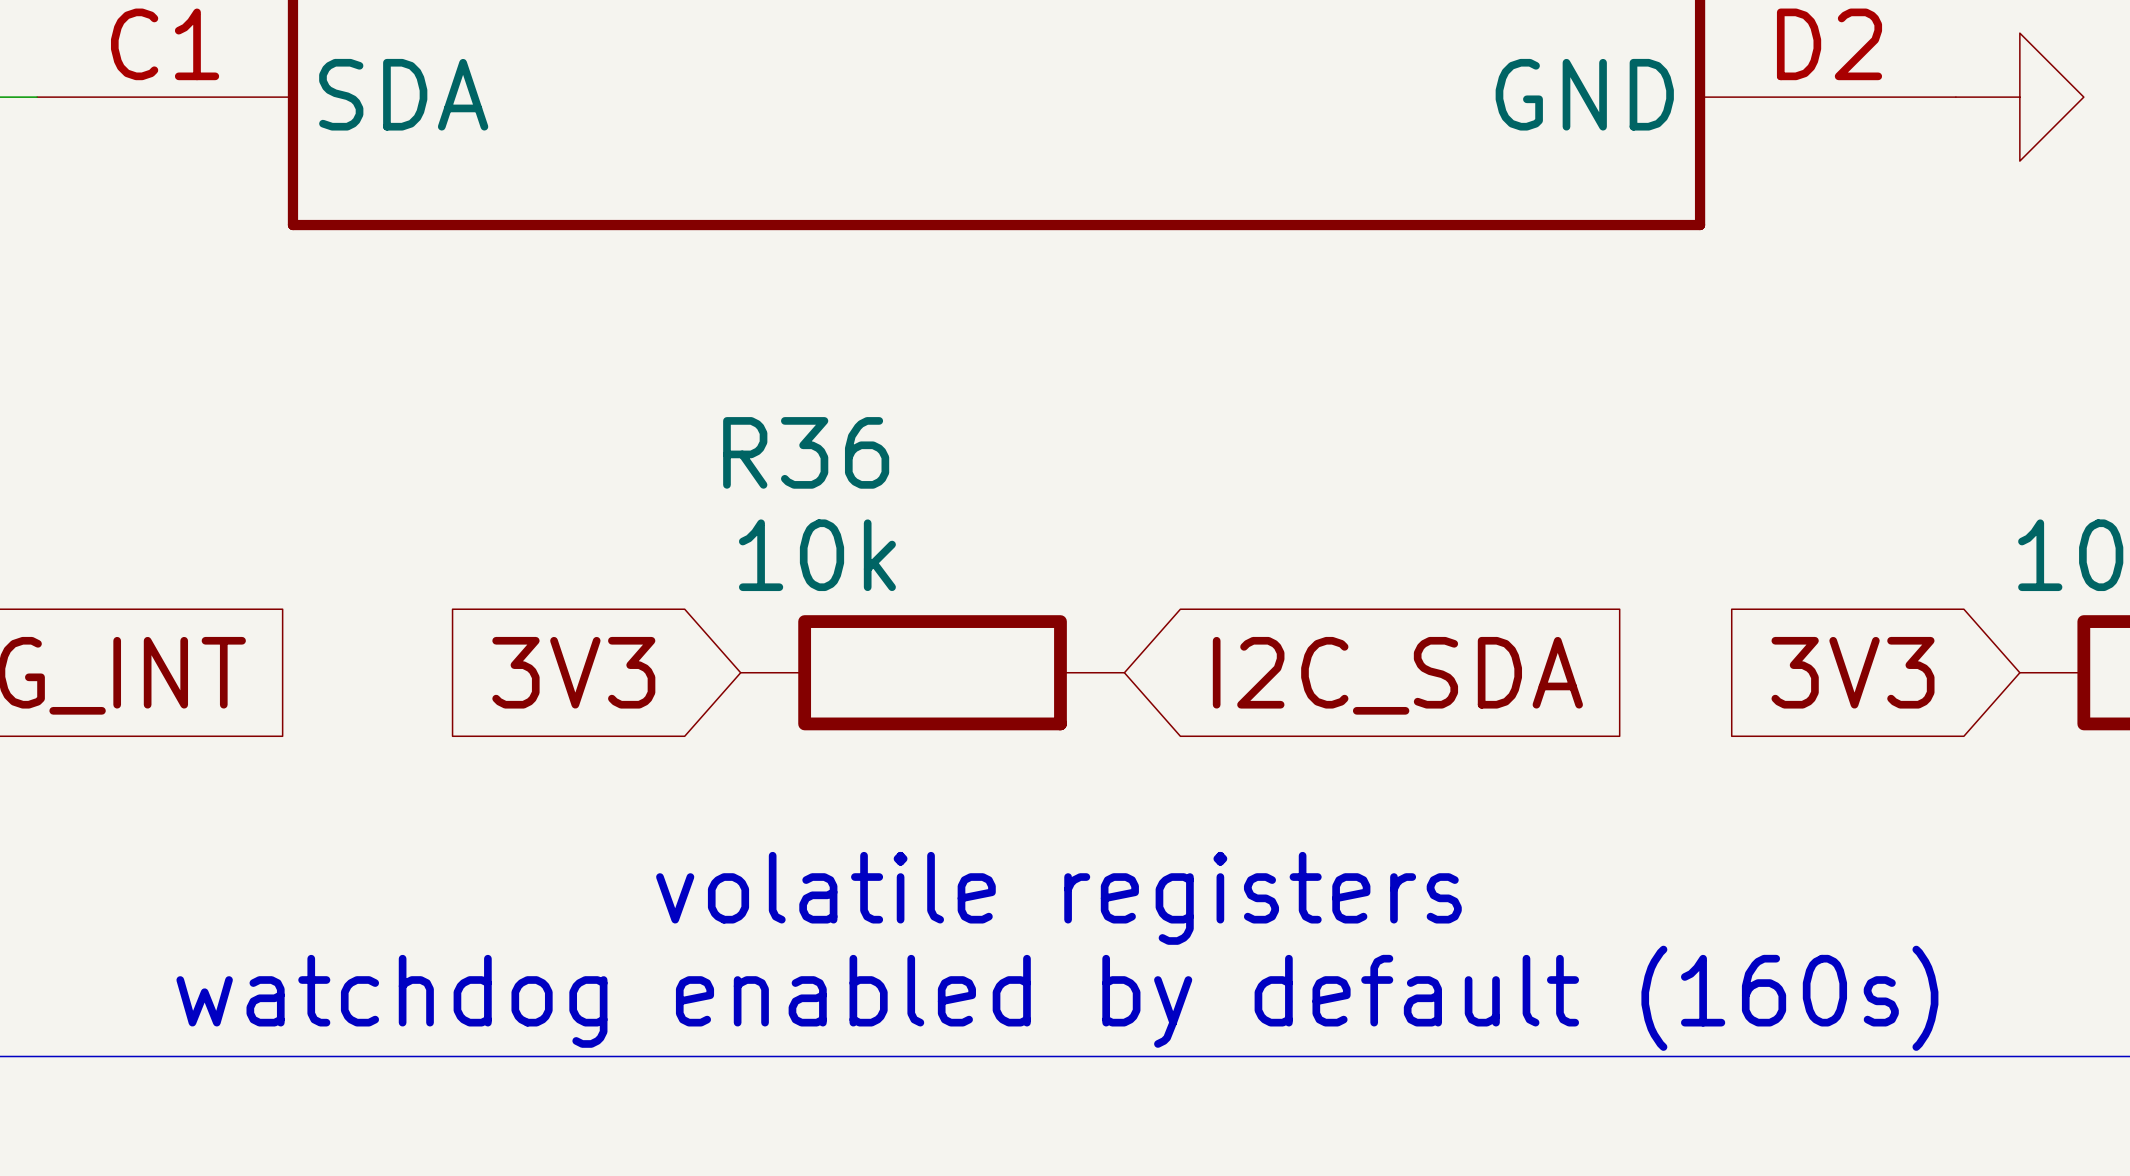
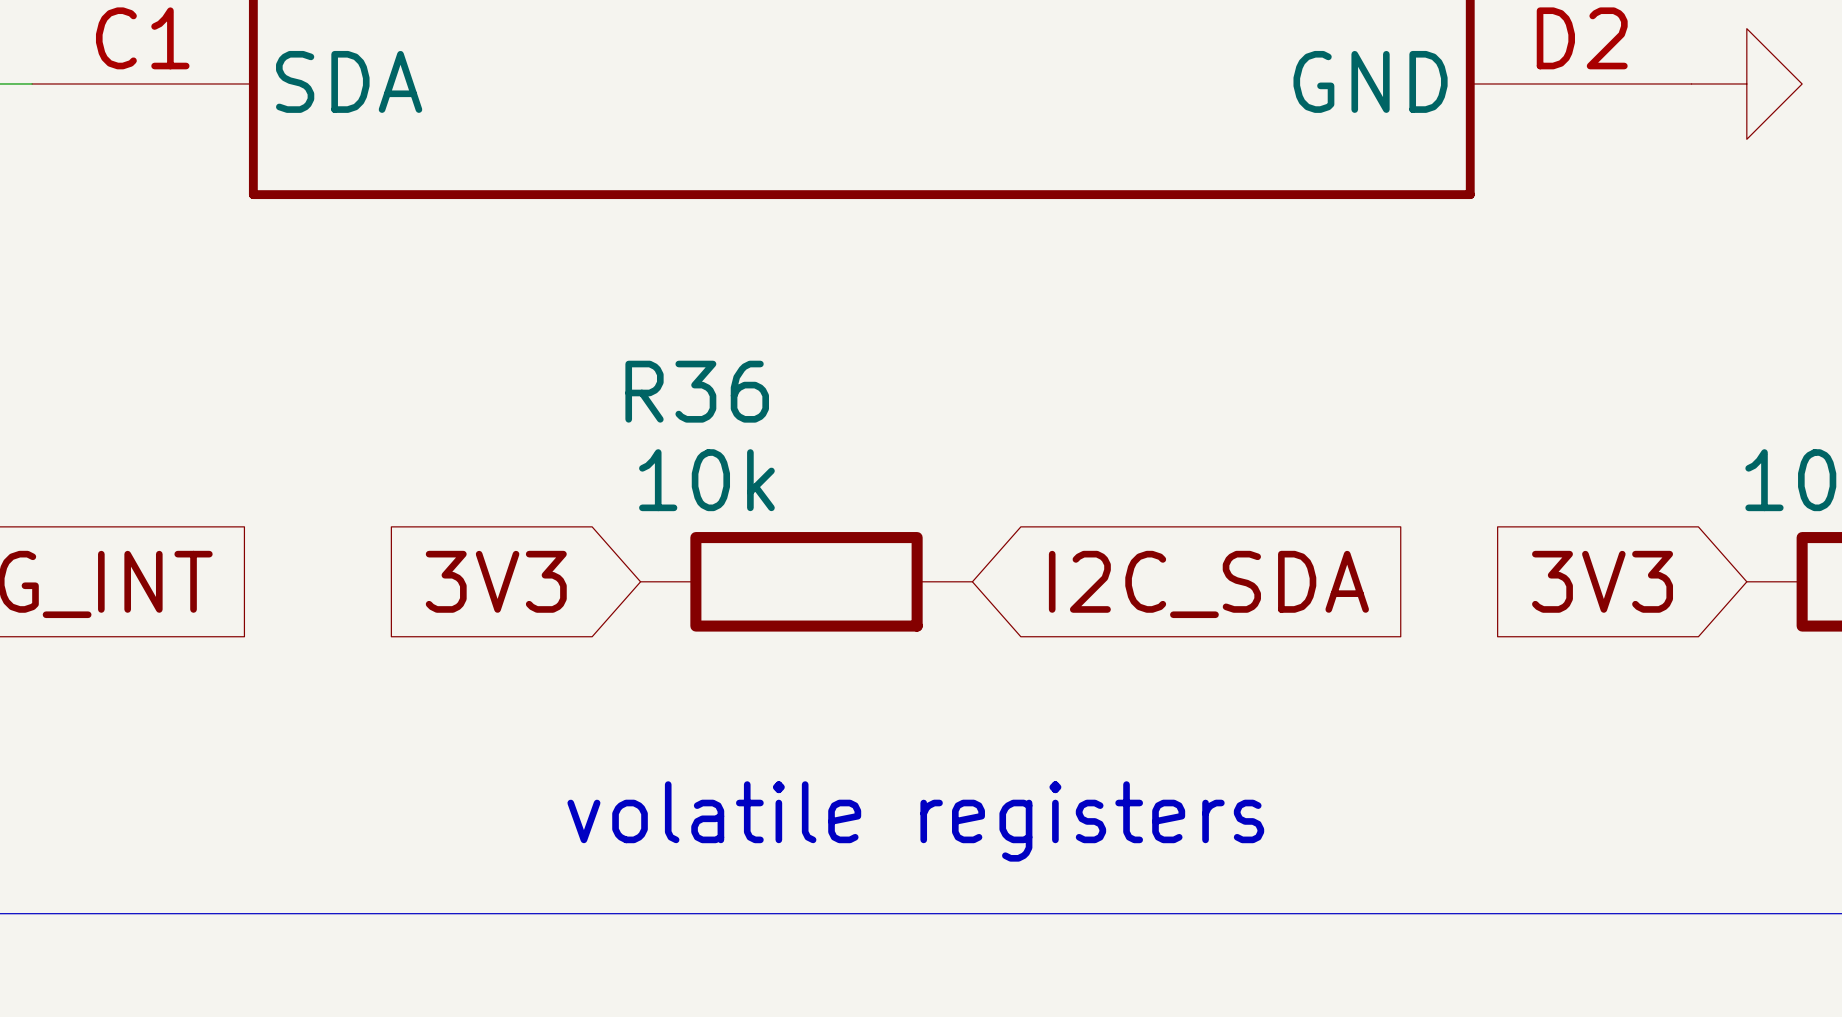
text position: volatile registers (1058, 898) -> volatile registers (915, 821)
text: watchdog enabled by default (160s) (1057, 998) -> none

